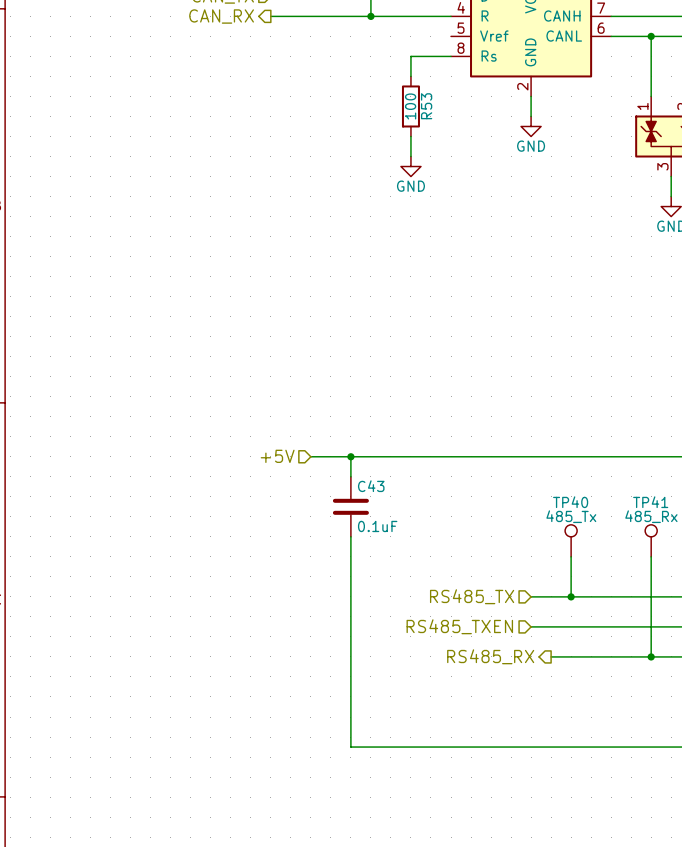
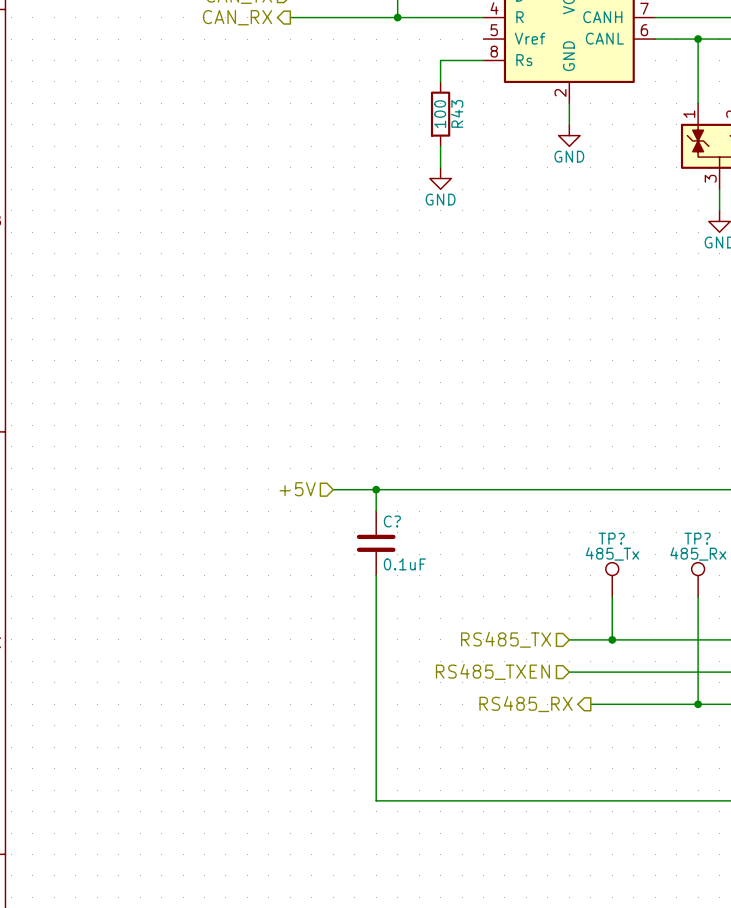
R53 name: R53 (426, 106) -> R43 (457, 113)
C43 name: C43 (371, 486) -> C? (392, 521)
TP40 name: TP40 (570, 502) -> TP? (611, 538)
TP41 name: TP41 (650, 502) -> TP? (697, 538)

